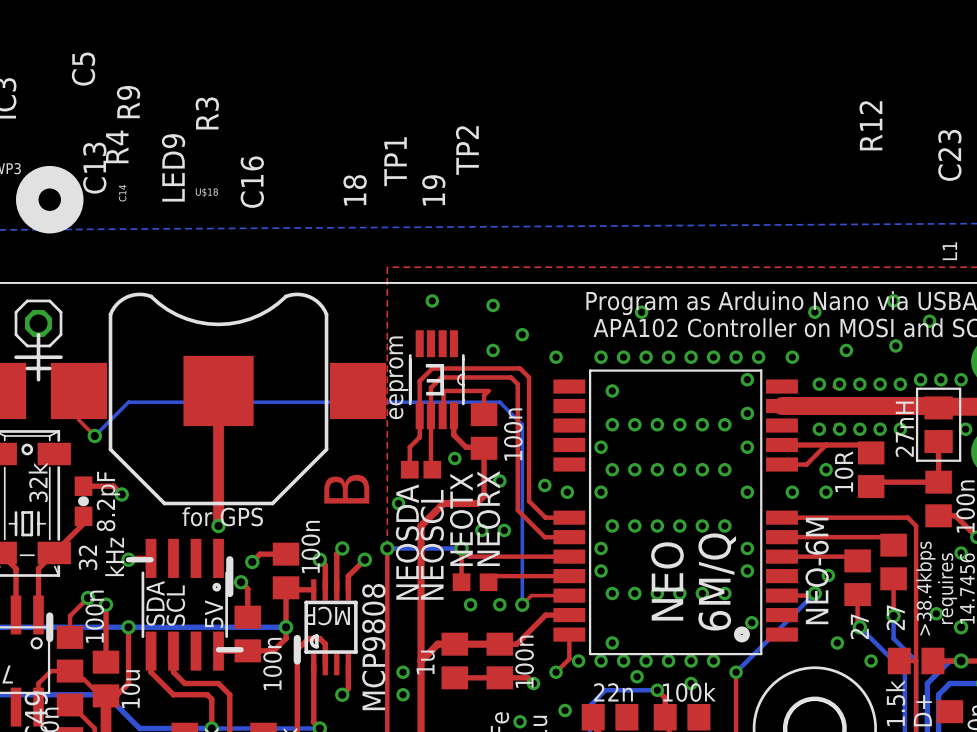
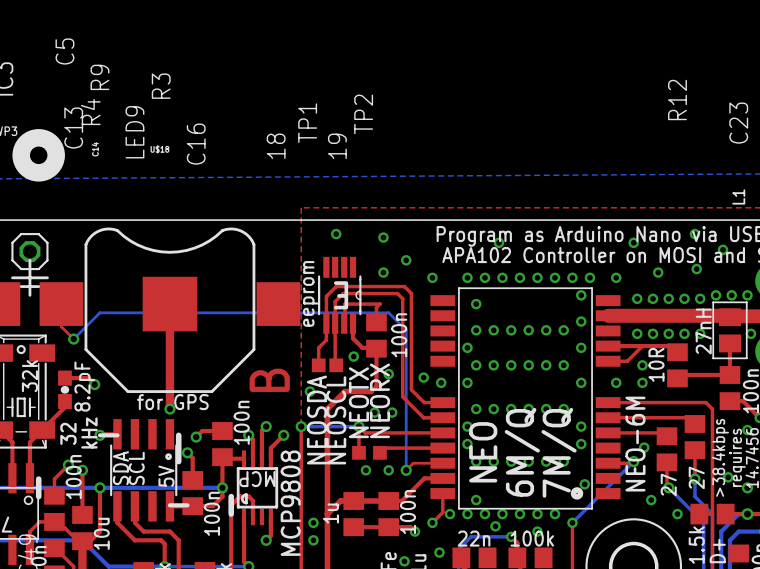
text: none -> NEO (483, 452)
text: NEO (667, 581) -> 6M/Q (522, 452)
text: 6M/Q (717, 581) -> 7M/Q (559, 452)

